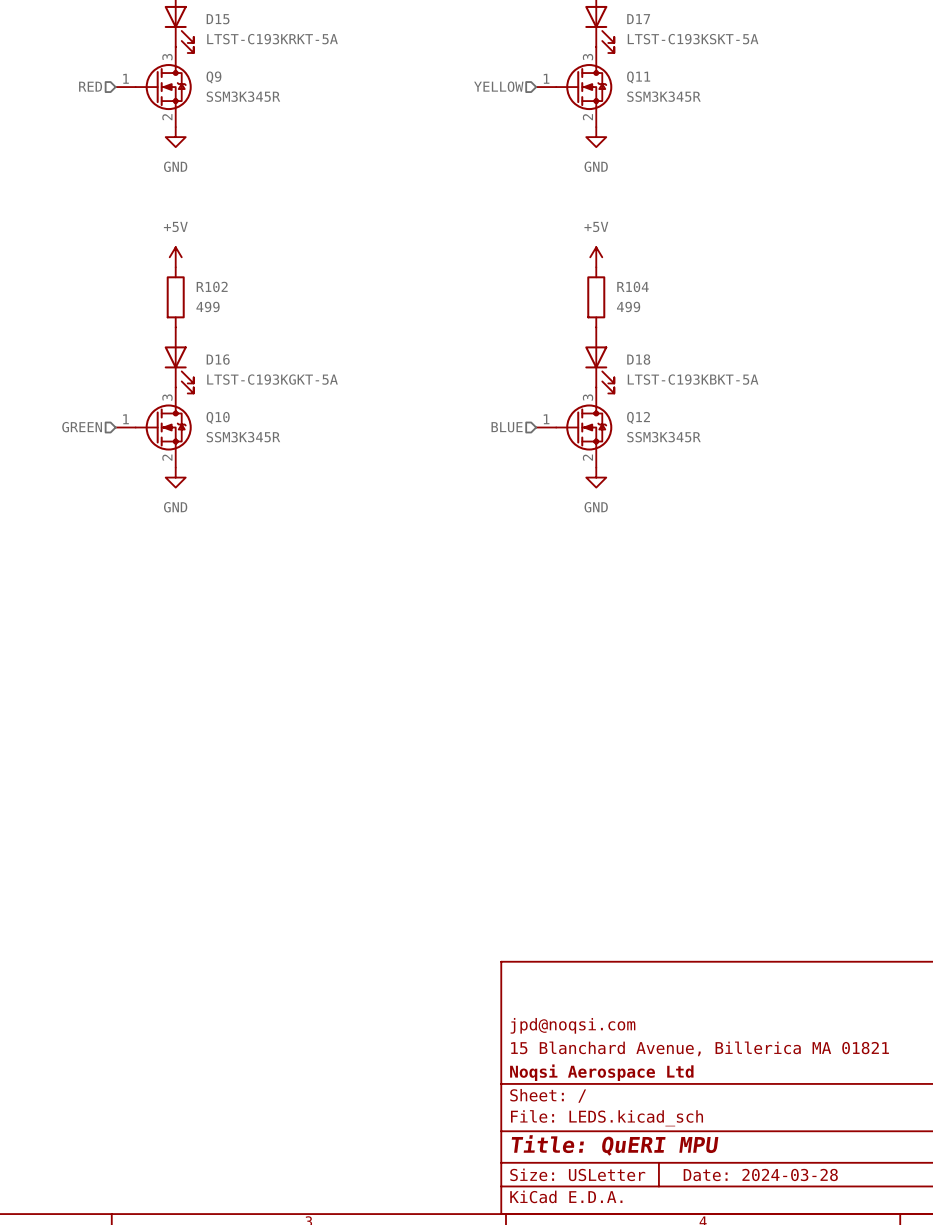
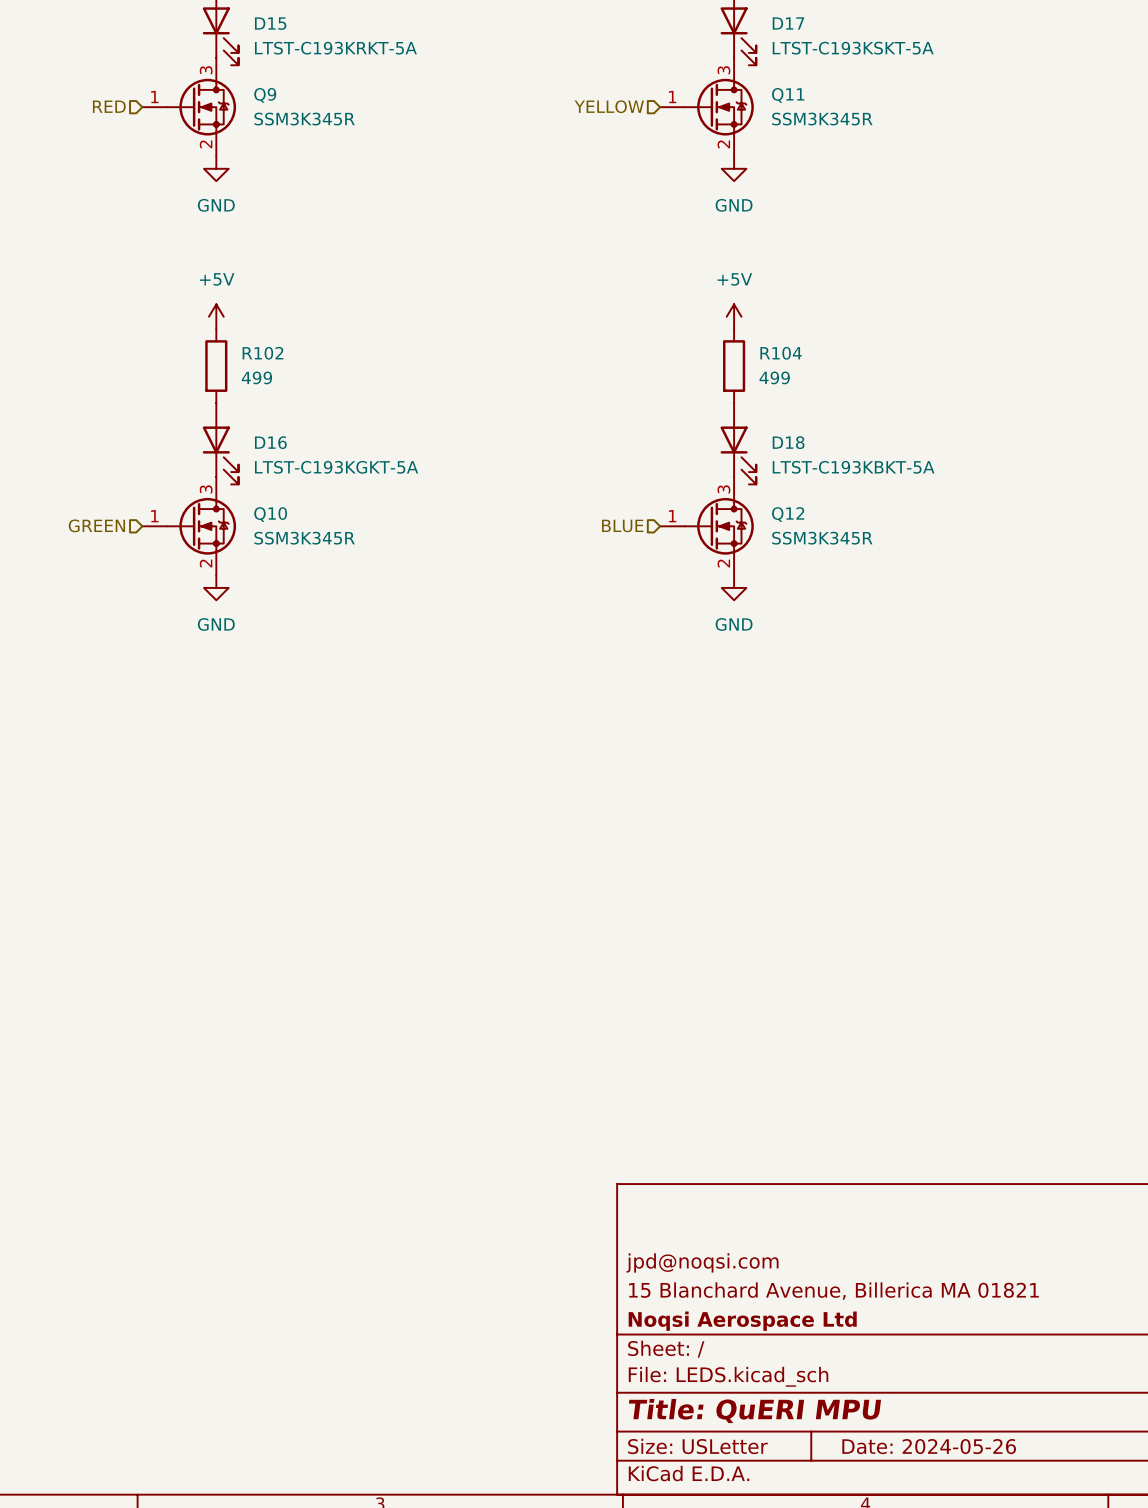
title block: Date: 2024-03-28 (760, 1174) -> Date: 2024-05-26 (929, 1446)

